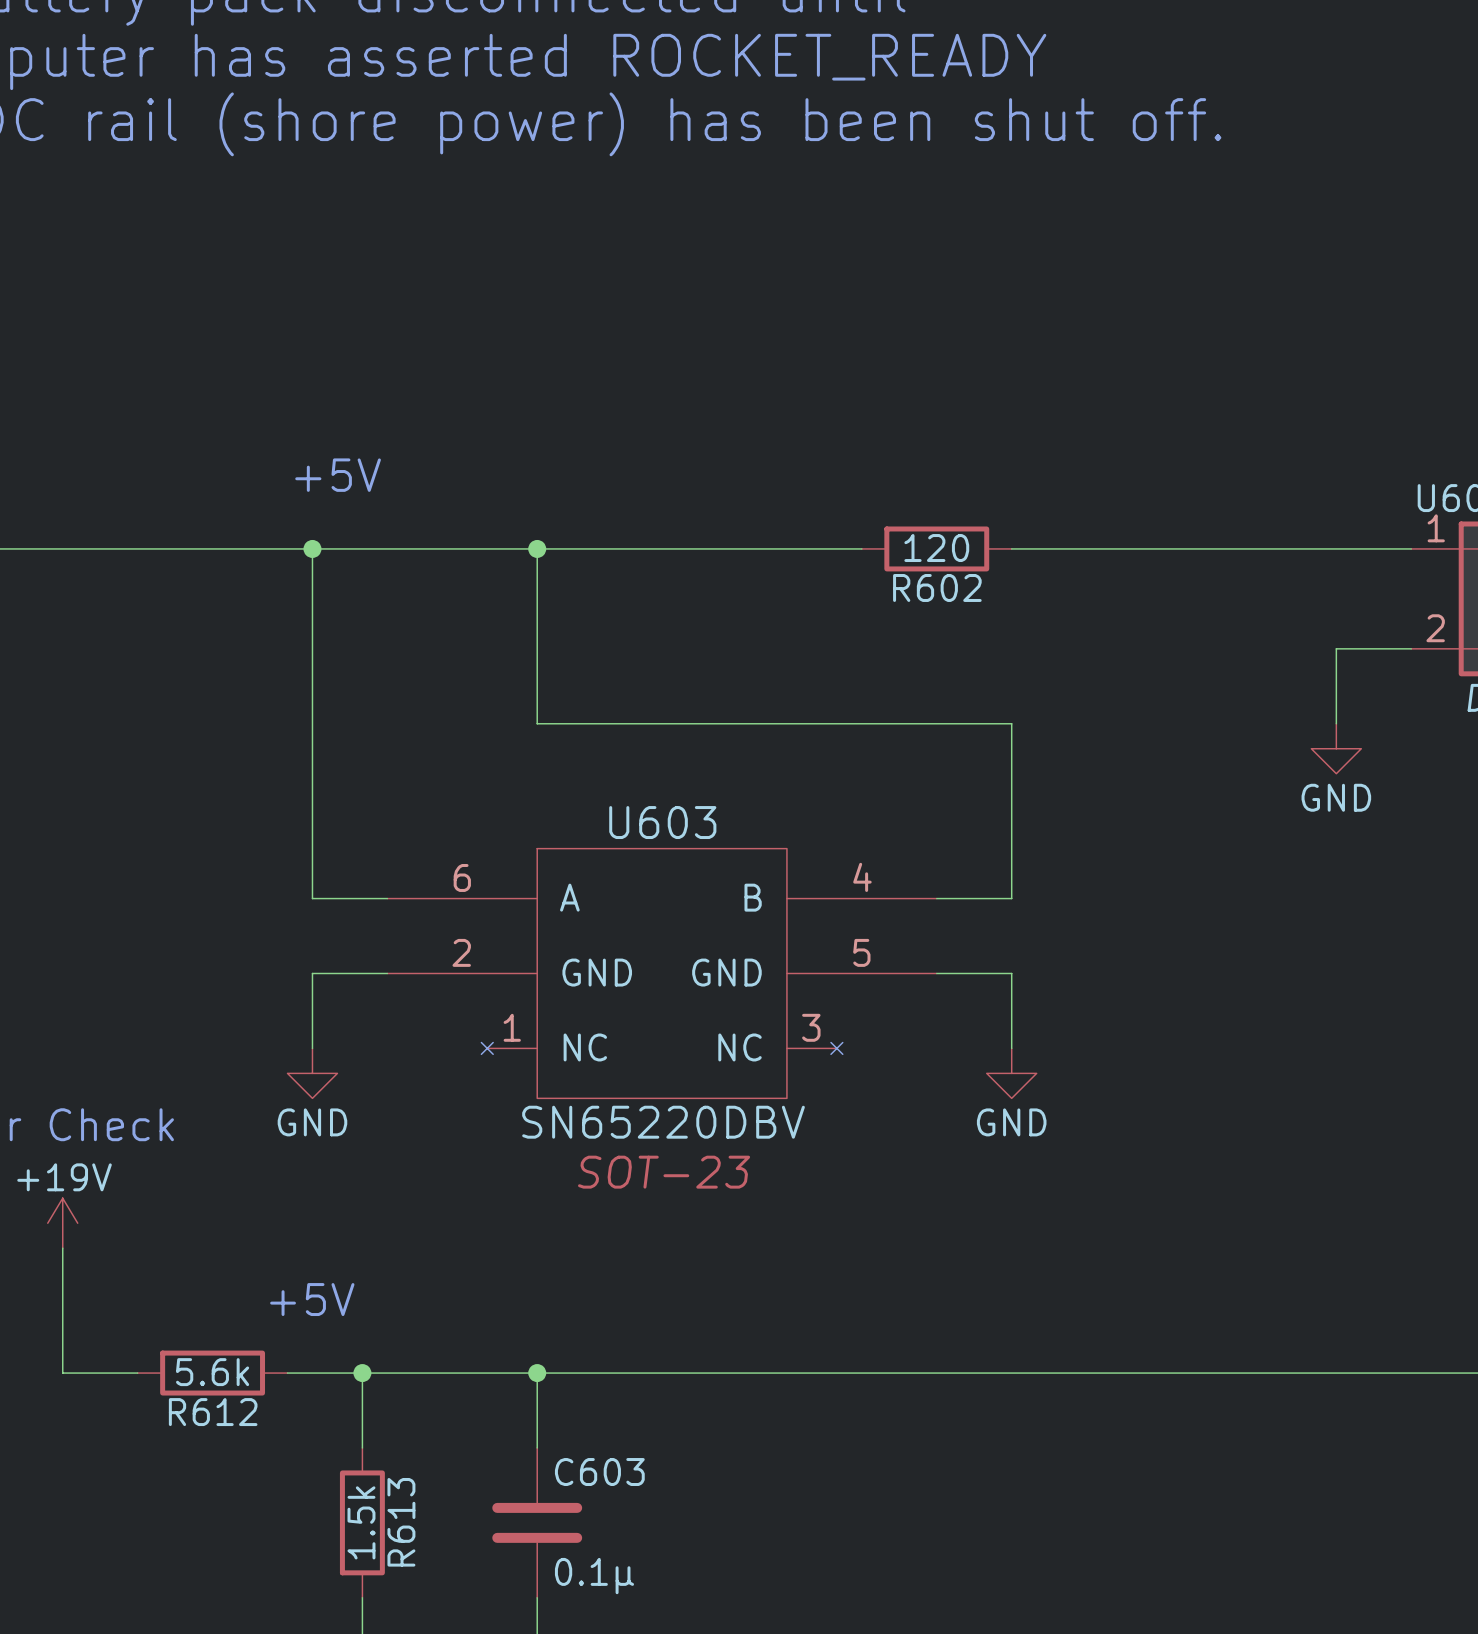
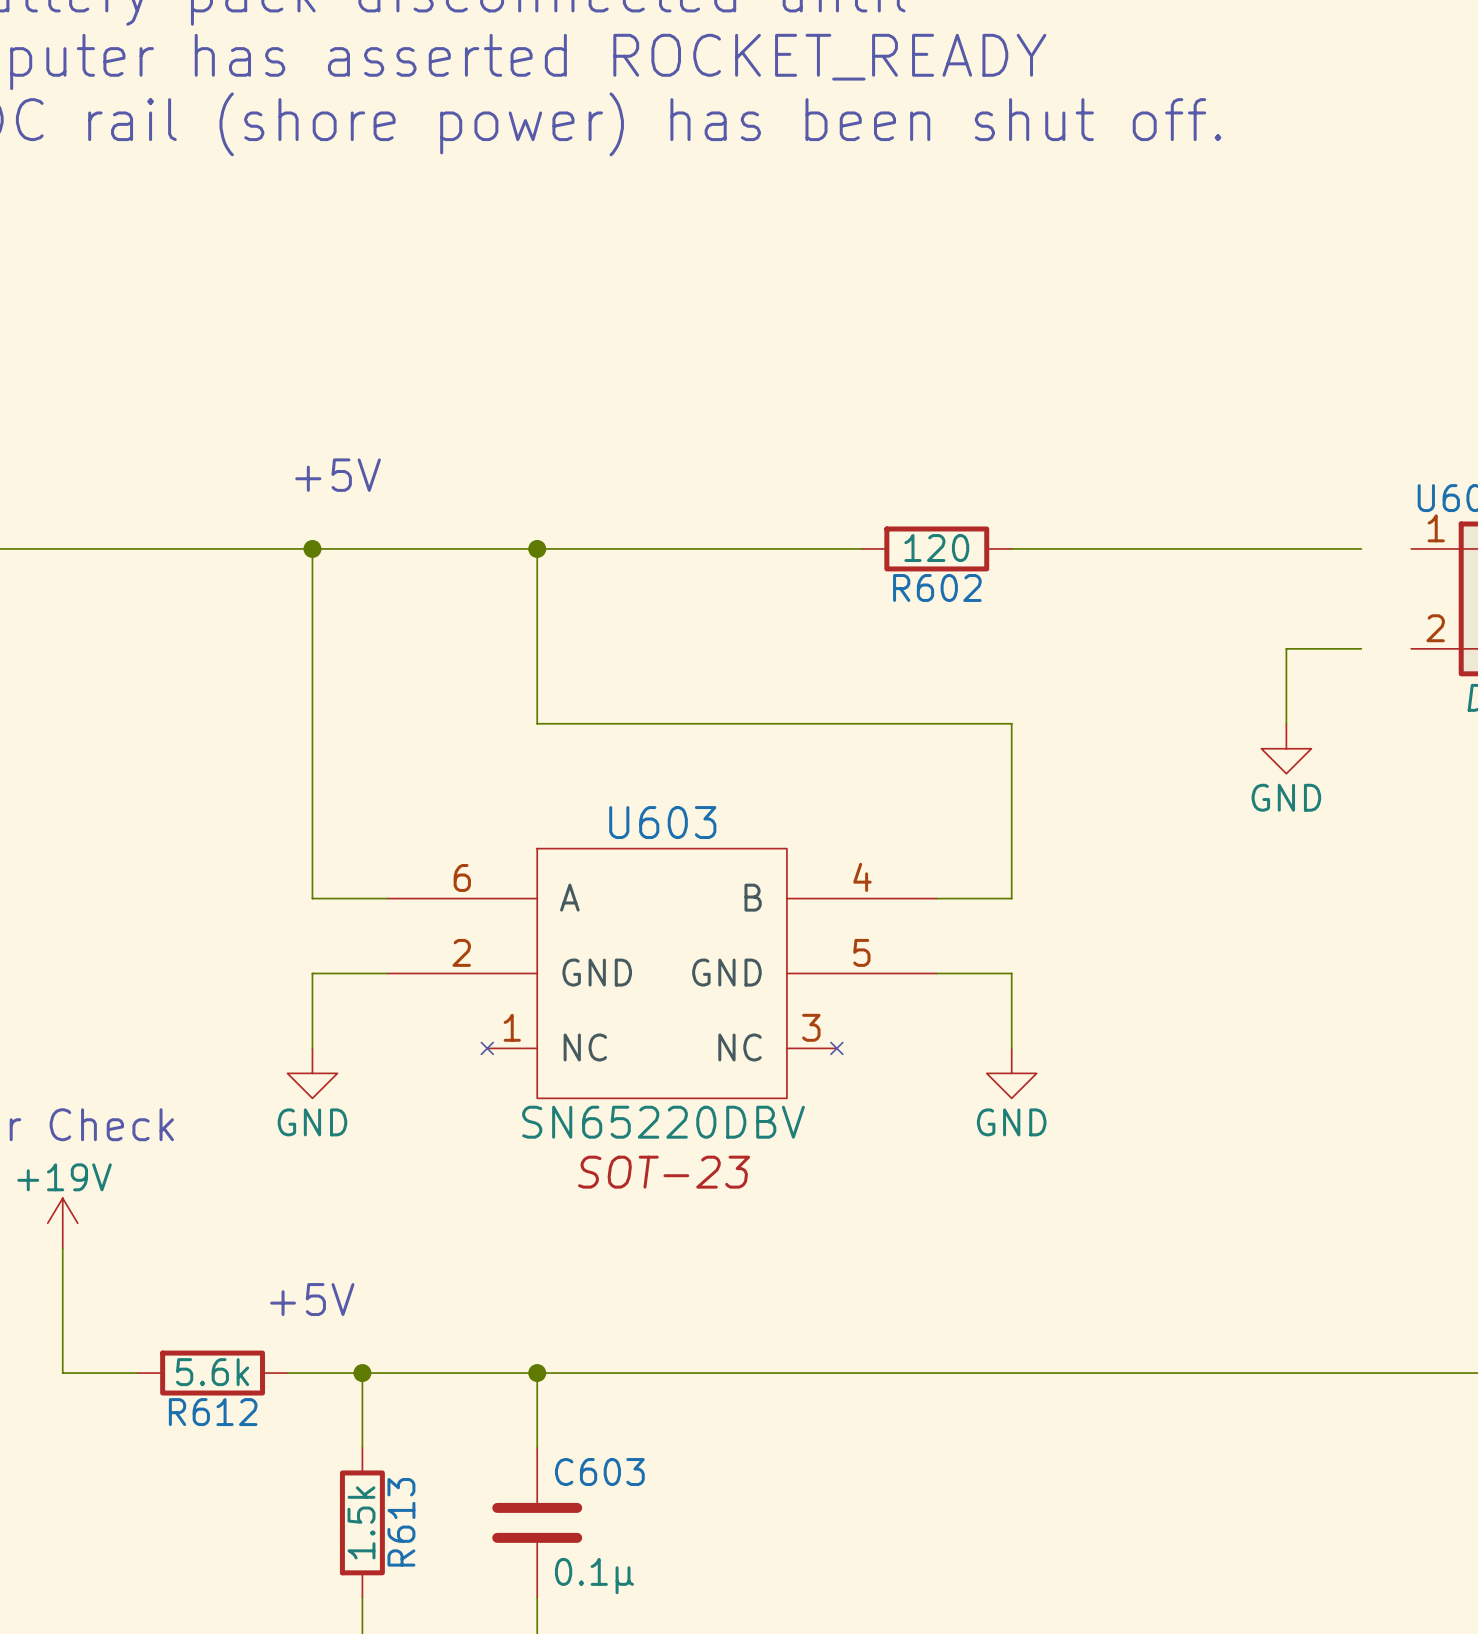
wire: (1361, 548) (1411, 548) -> none
wire: (1336, 648) (1336, 723) -> (1336, 648) (1286, 648) (1286, 723)
wire: (1361, 648) (1411, 648) -> none
power symbol position: GND (1336, 748) -> GND (1286, 748)

